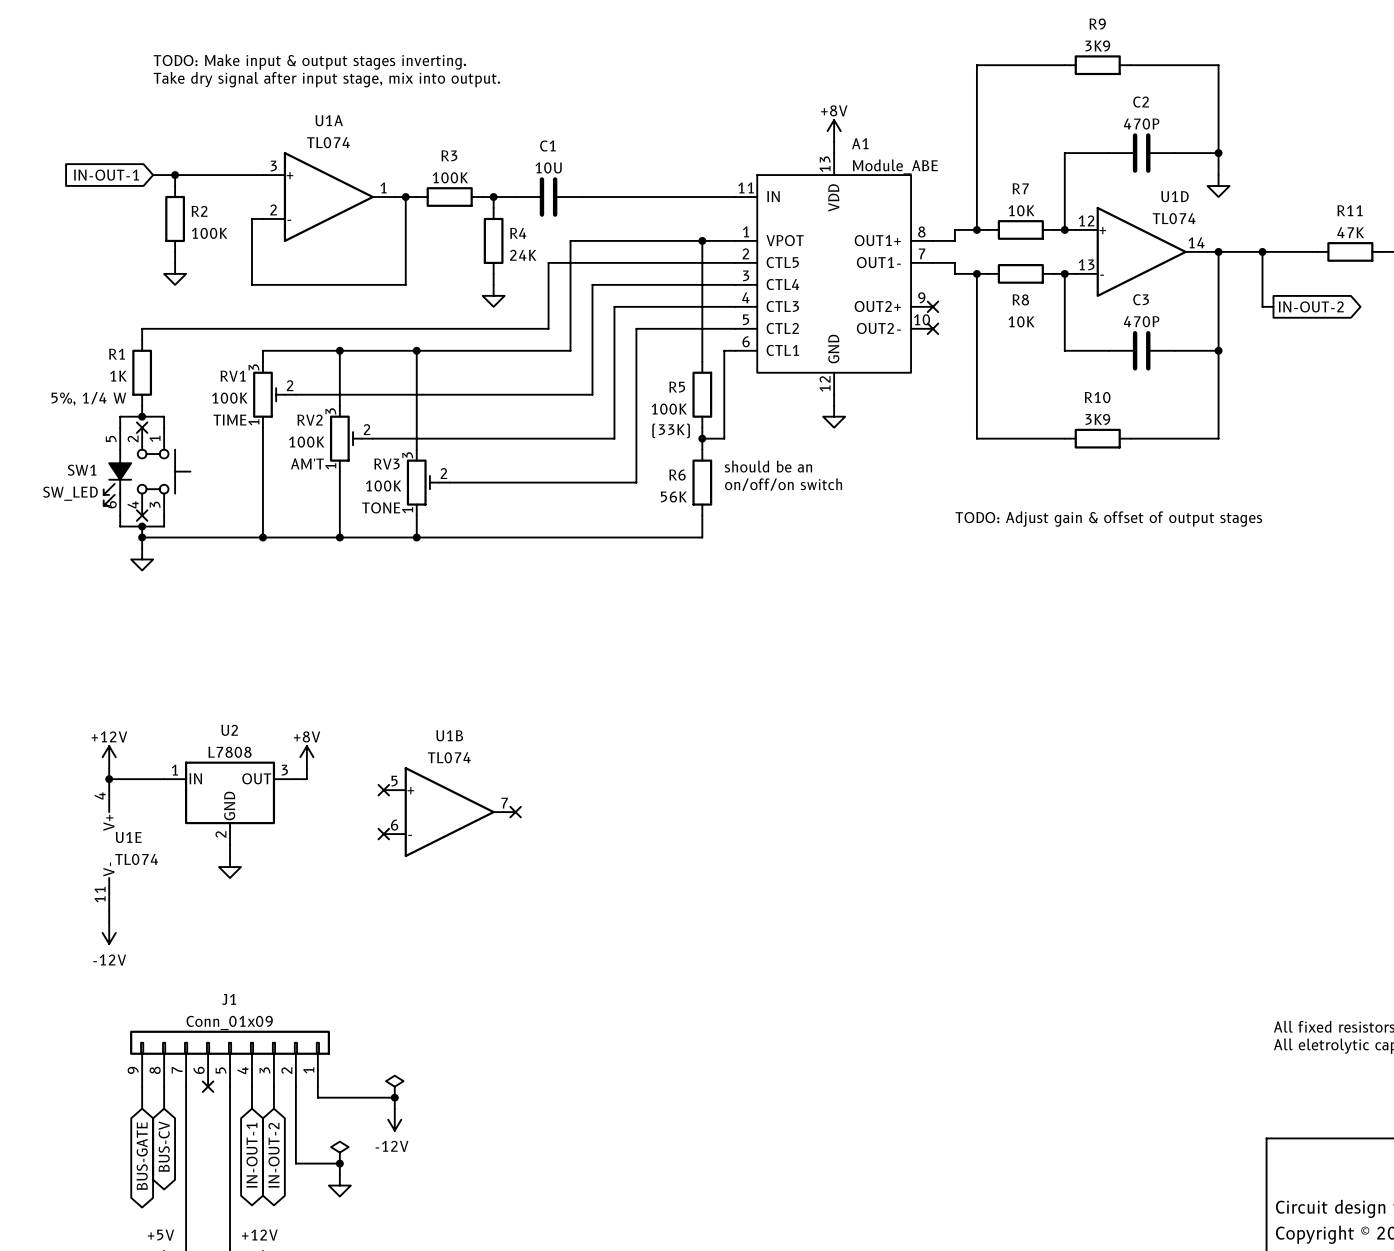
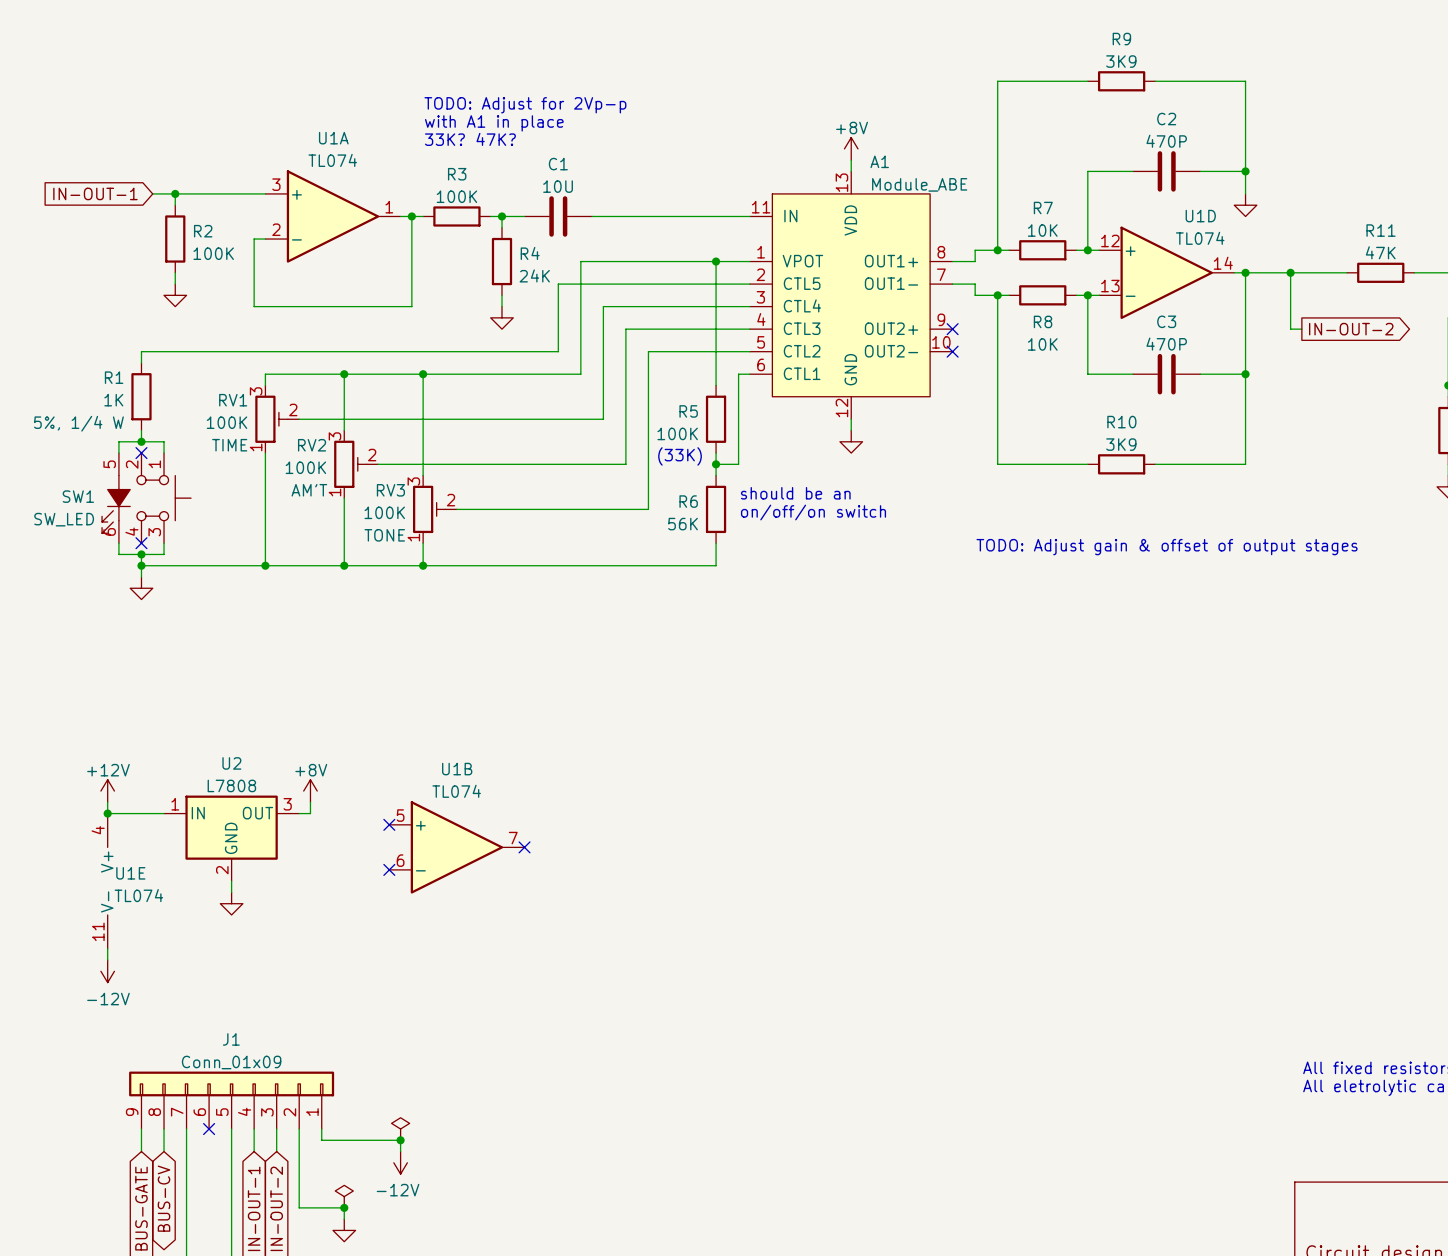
text: TODO: Make input & output stages inverting. (309, 62) -> none
text: Take dry signal after input stage, mix into output. (326, 79) -> none
text: none -> TODO: Adjust for 2Vp-p (525, 105)
text: none -> with A1 in place (494, 123)
text: none -> 33K? 47K? (470, 139)

